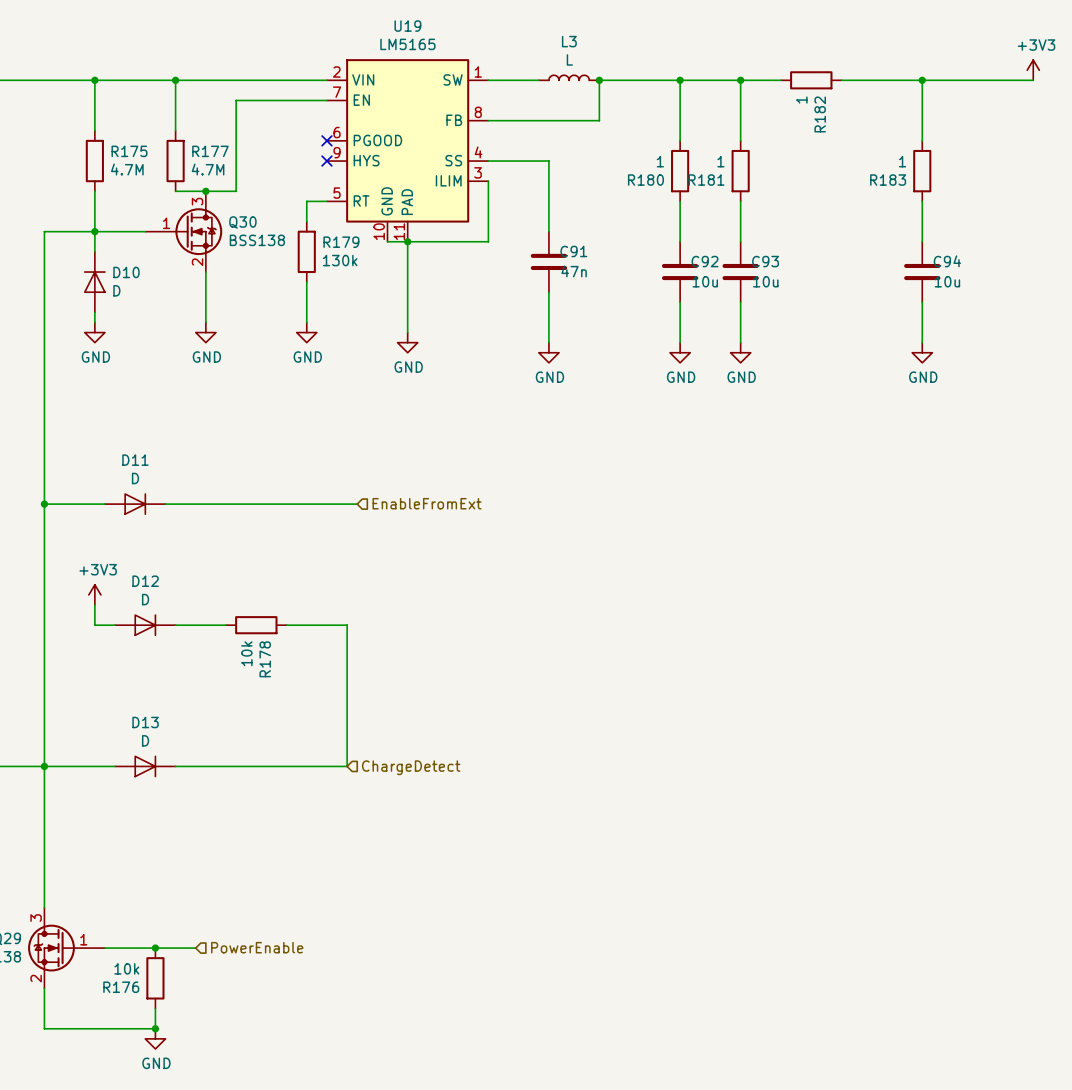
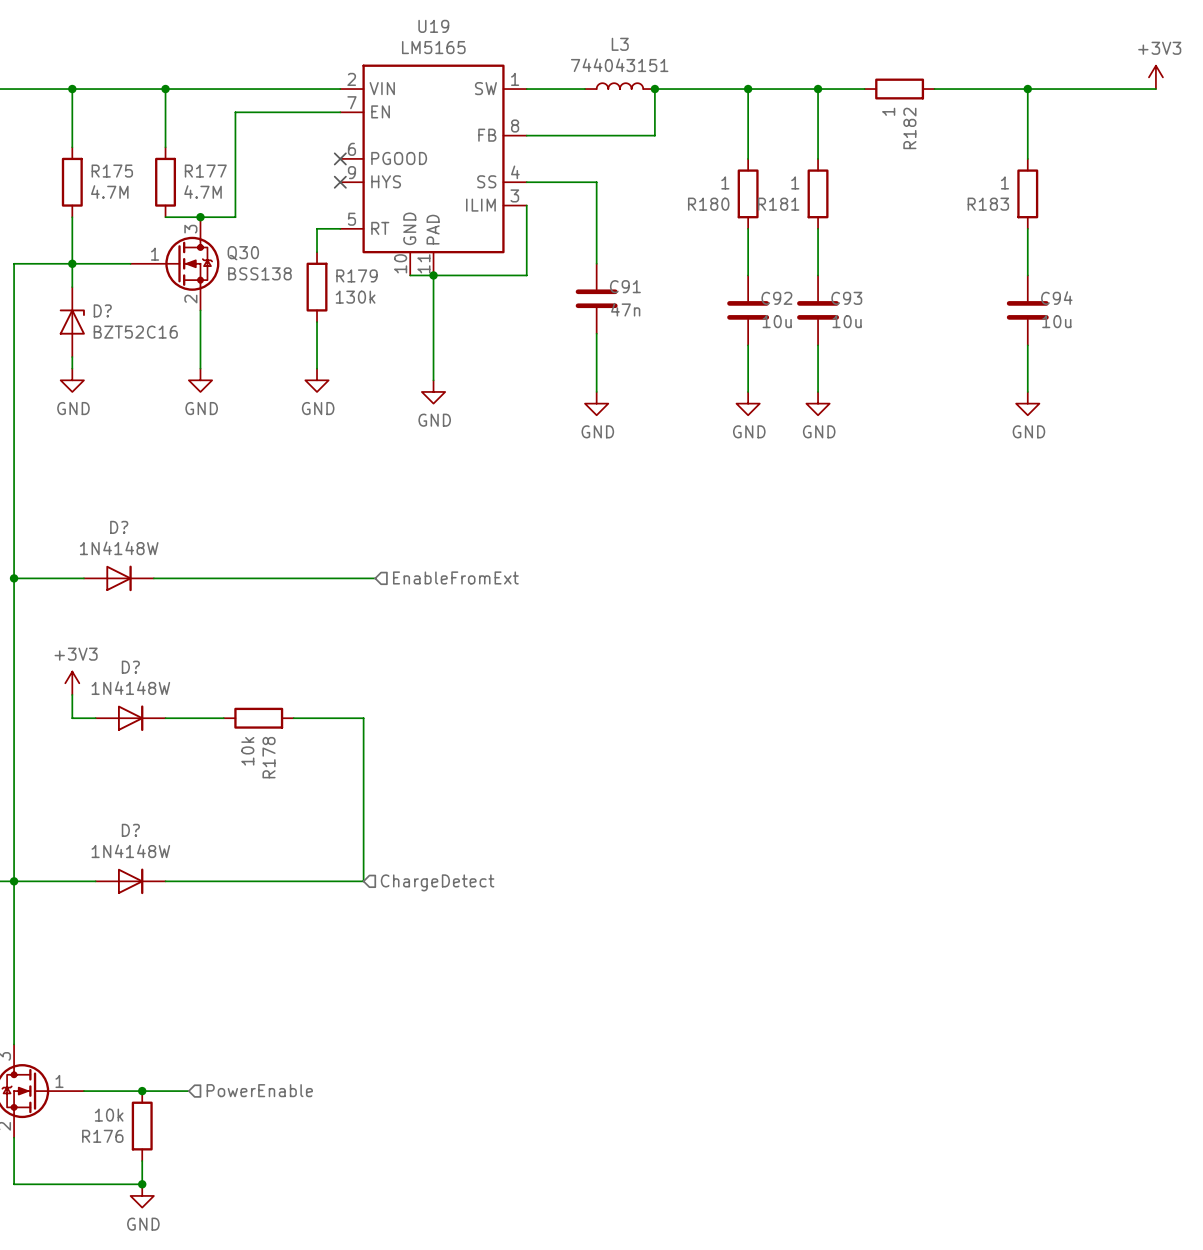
L3 value: L (569, 59) -> 744043151 (619, 65)
D10: D (94, 282) -> none
D?: none -> BZT52C16 (72, 322)
D11: D (135, 504) -> none
D?: none -> 1N4148W (118, 578)
D12: D (145, 625) -> none
D?: none -> 1N4148W (130, 718)
D13: D (145, 766) -> none
D?: none -> 1N4148W (130, 881)

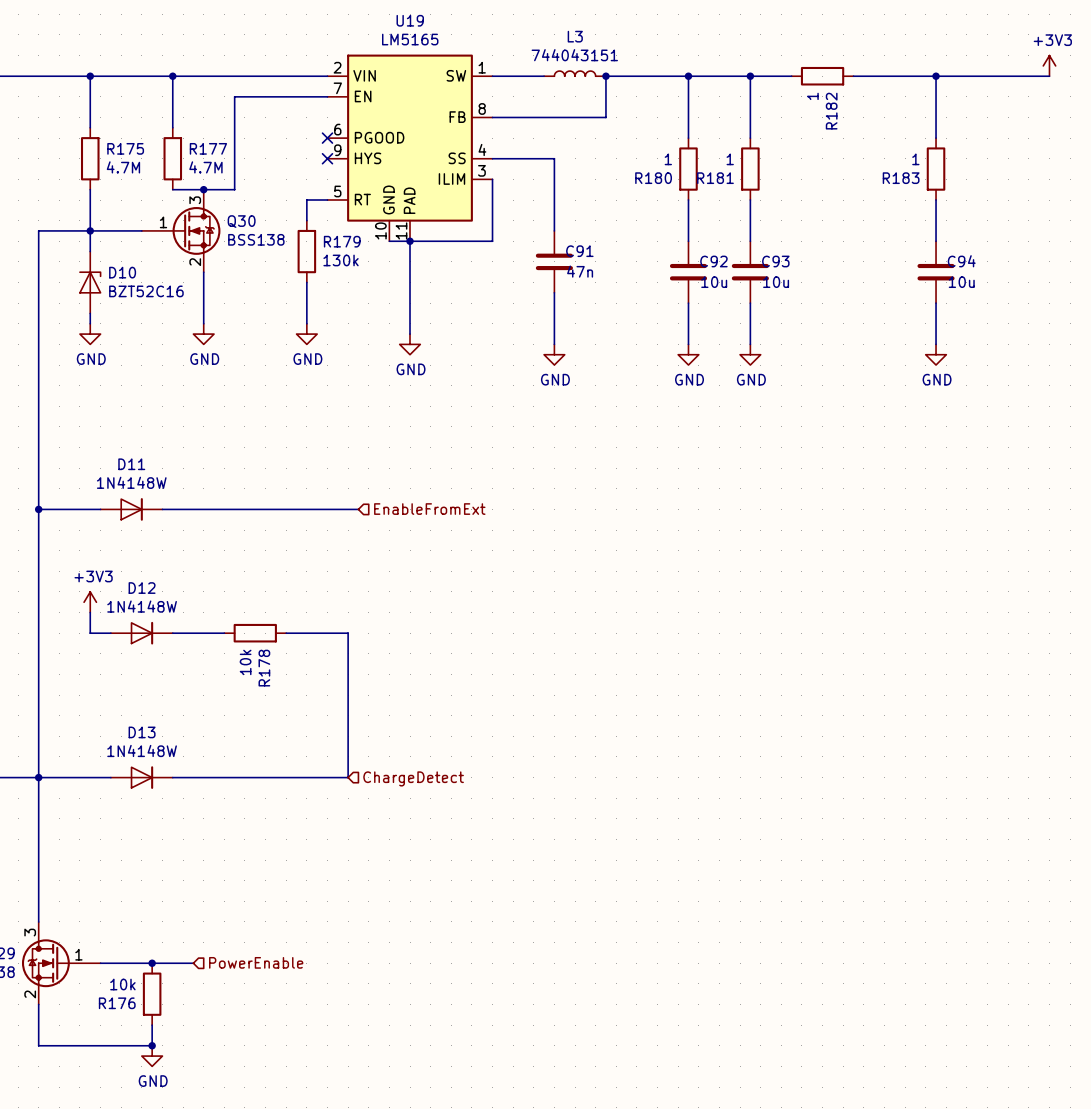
D? name: D? (102, 310) -> D10 (122, 272)
D? name: D? (119, 527) -> D11 (131, 464)
D? name: D? (130, 667) -> D12 (142, 588)
D? name: D? (130, 830) -> D13 (142, 732)

